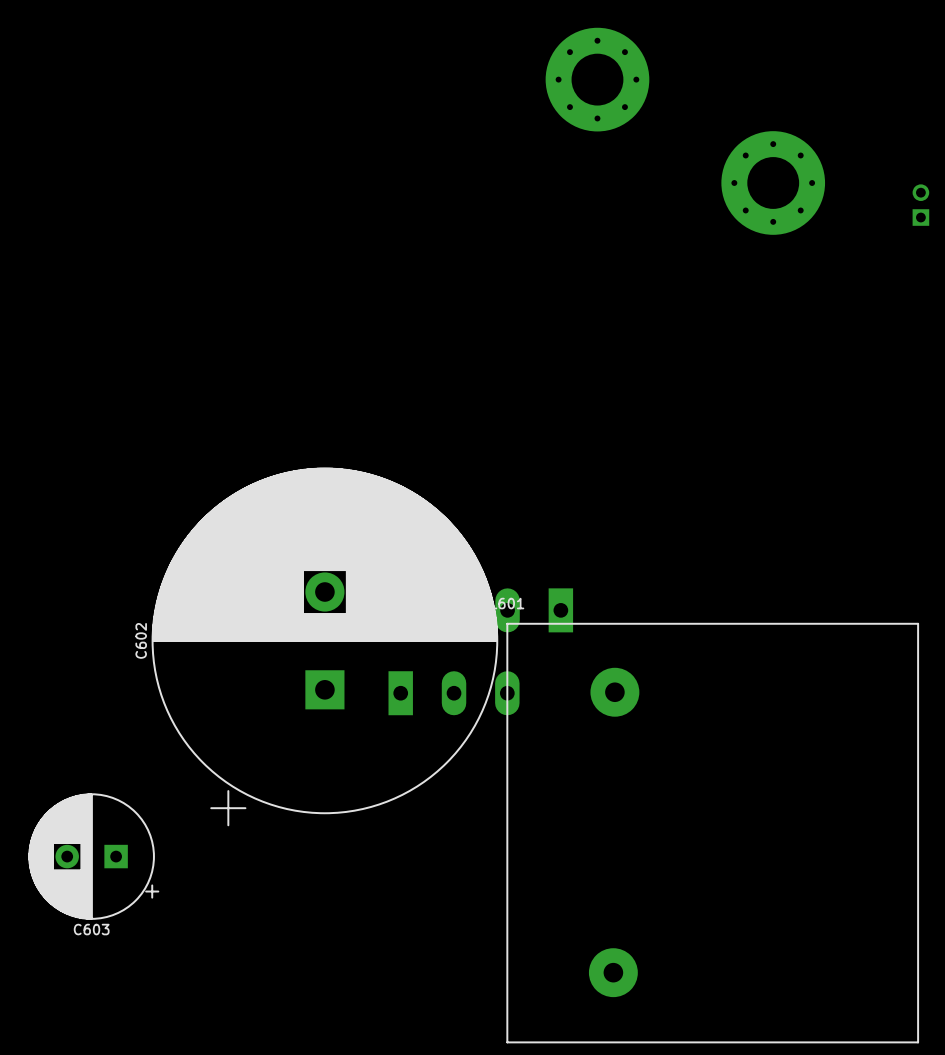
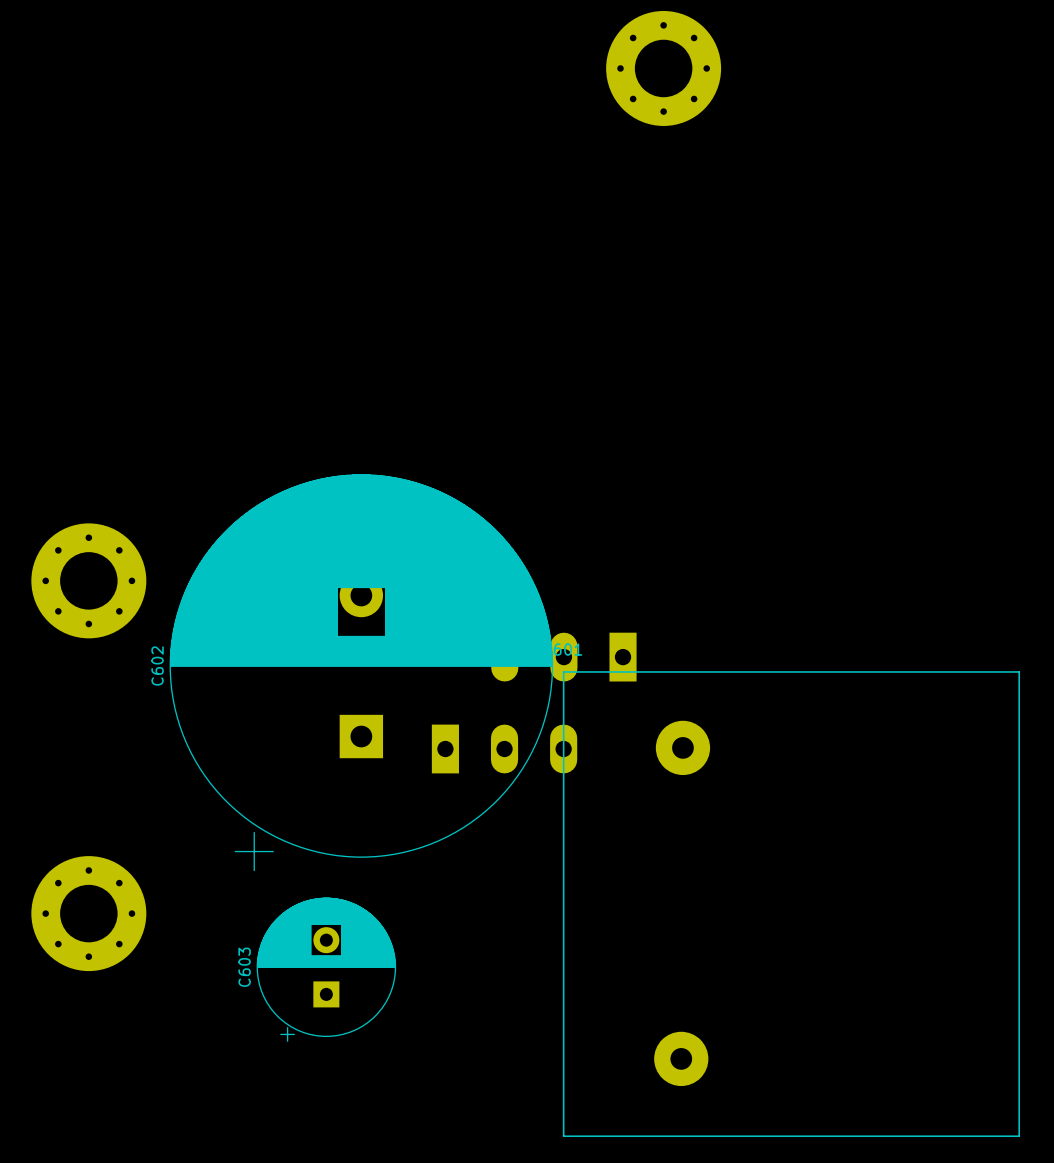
part: (773, 182) -> none
part: (920, 205) -> none
C602 footprint: [152, 467, 498, 826] -> [169, 474, 554, 872]
part: none -> (88, 580)
part: none -> (88, 913)
C603 rotation: 0° (93, 856) -> 90° clockwise (326, 969)
C603 position: (93, 856) -> (326, 969)

